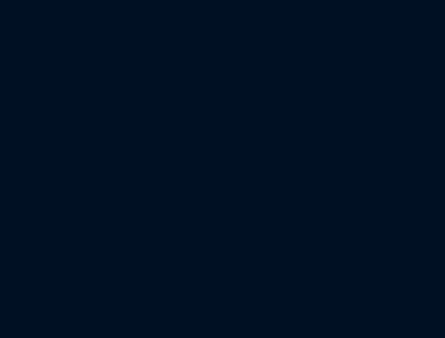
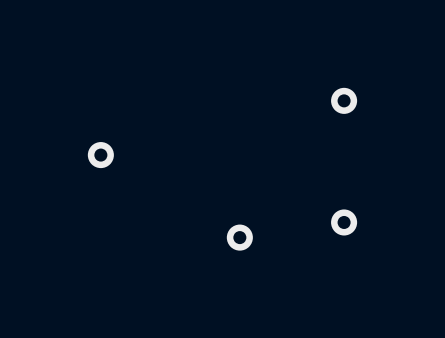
via: none -> (344, 100)
via: none -> (100, 155)
via: none -> (344, 222)
via: none -> (239, 237)

